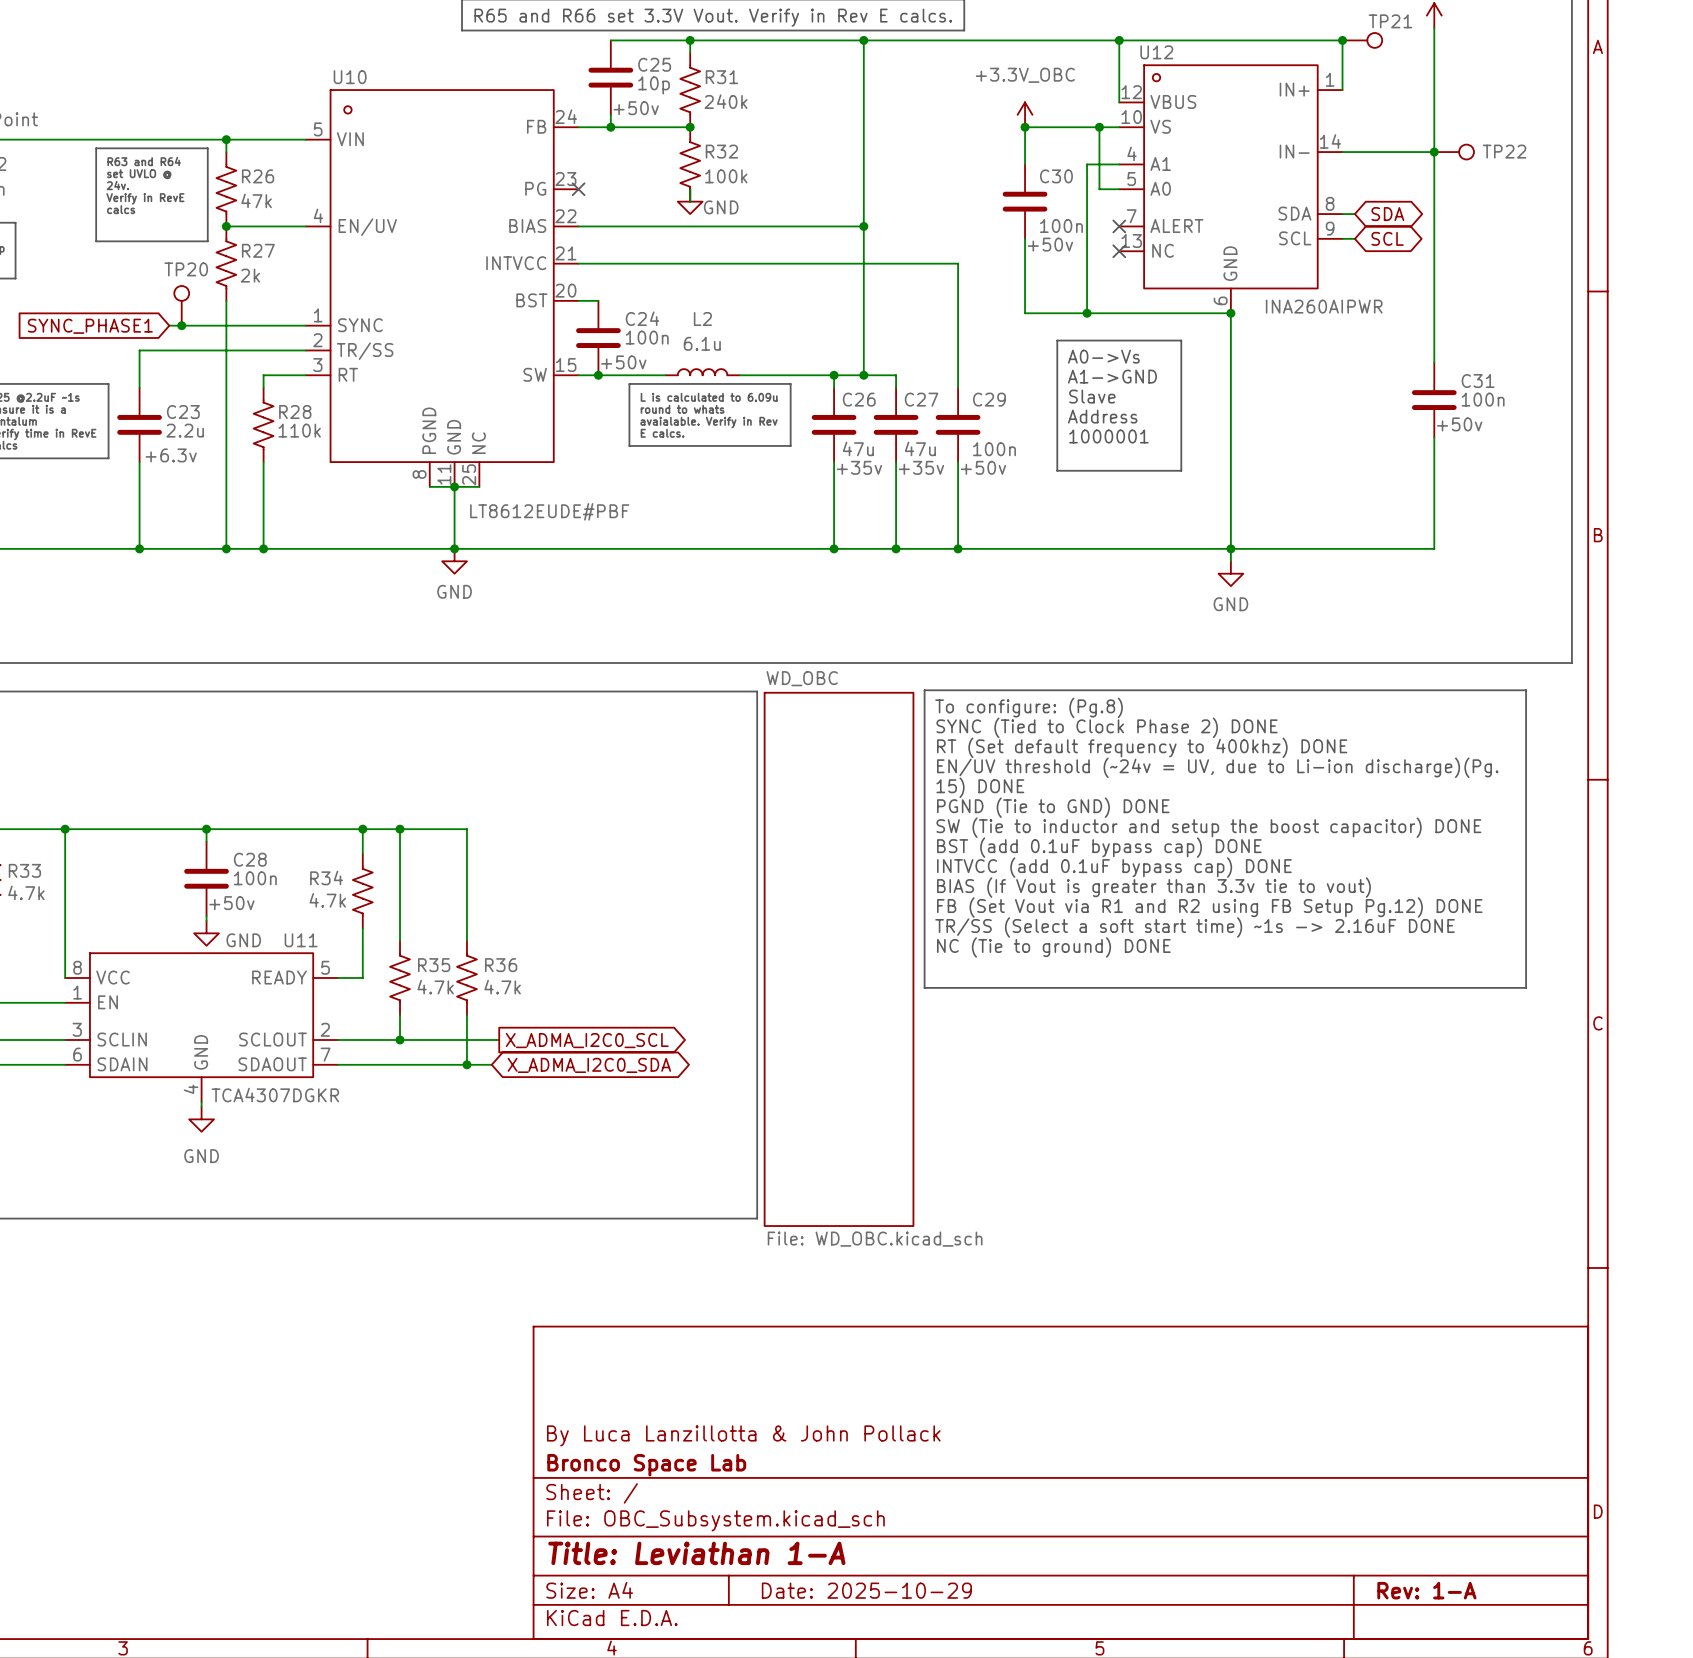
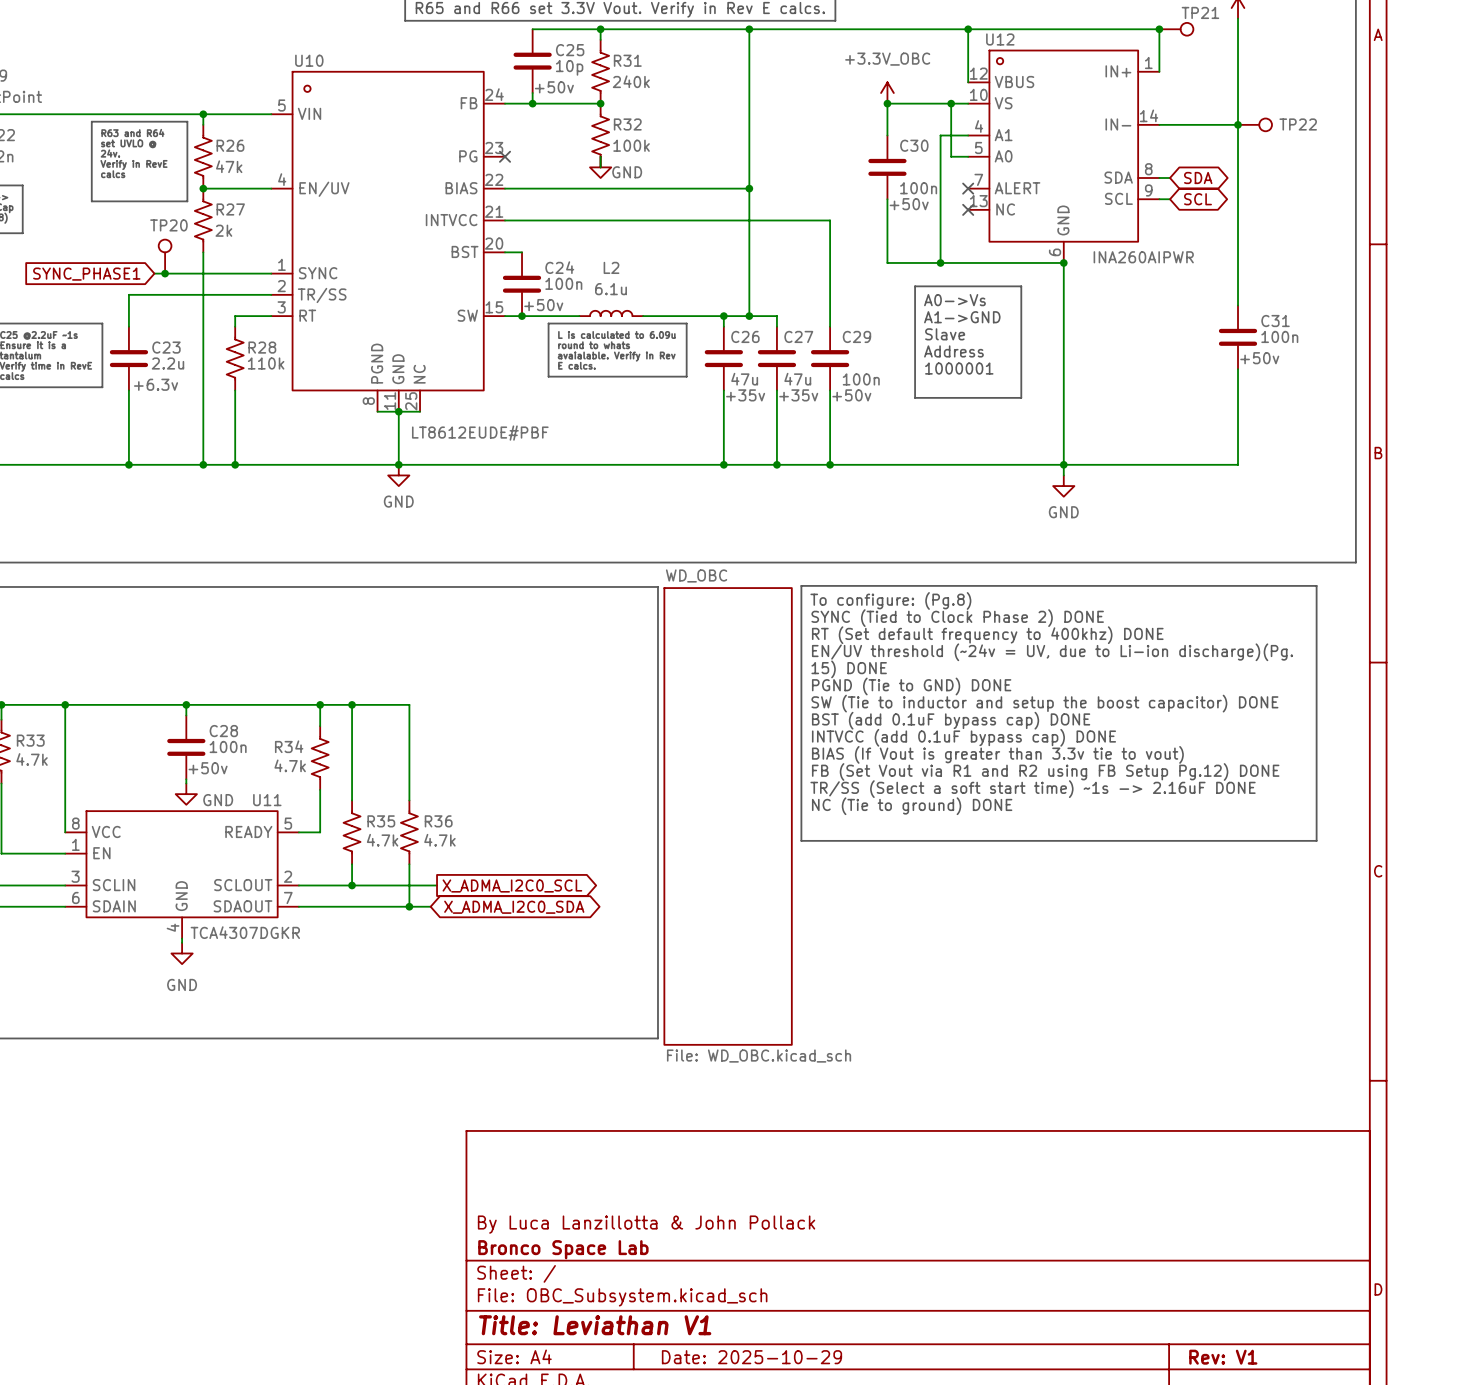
title block: Title: Leviathan 1-A (696, 1553) -> Title: Leviathan V1 (595, 1325)
title block: Rev: 1-A (1426, 1590) -> Rev: V1 (1223, 1357)

